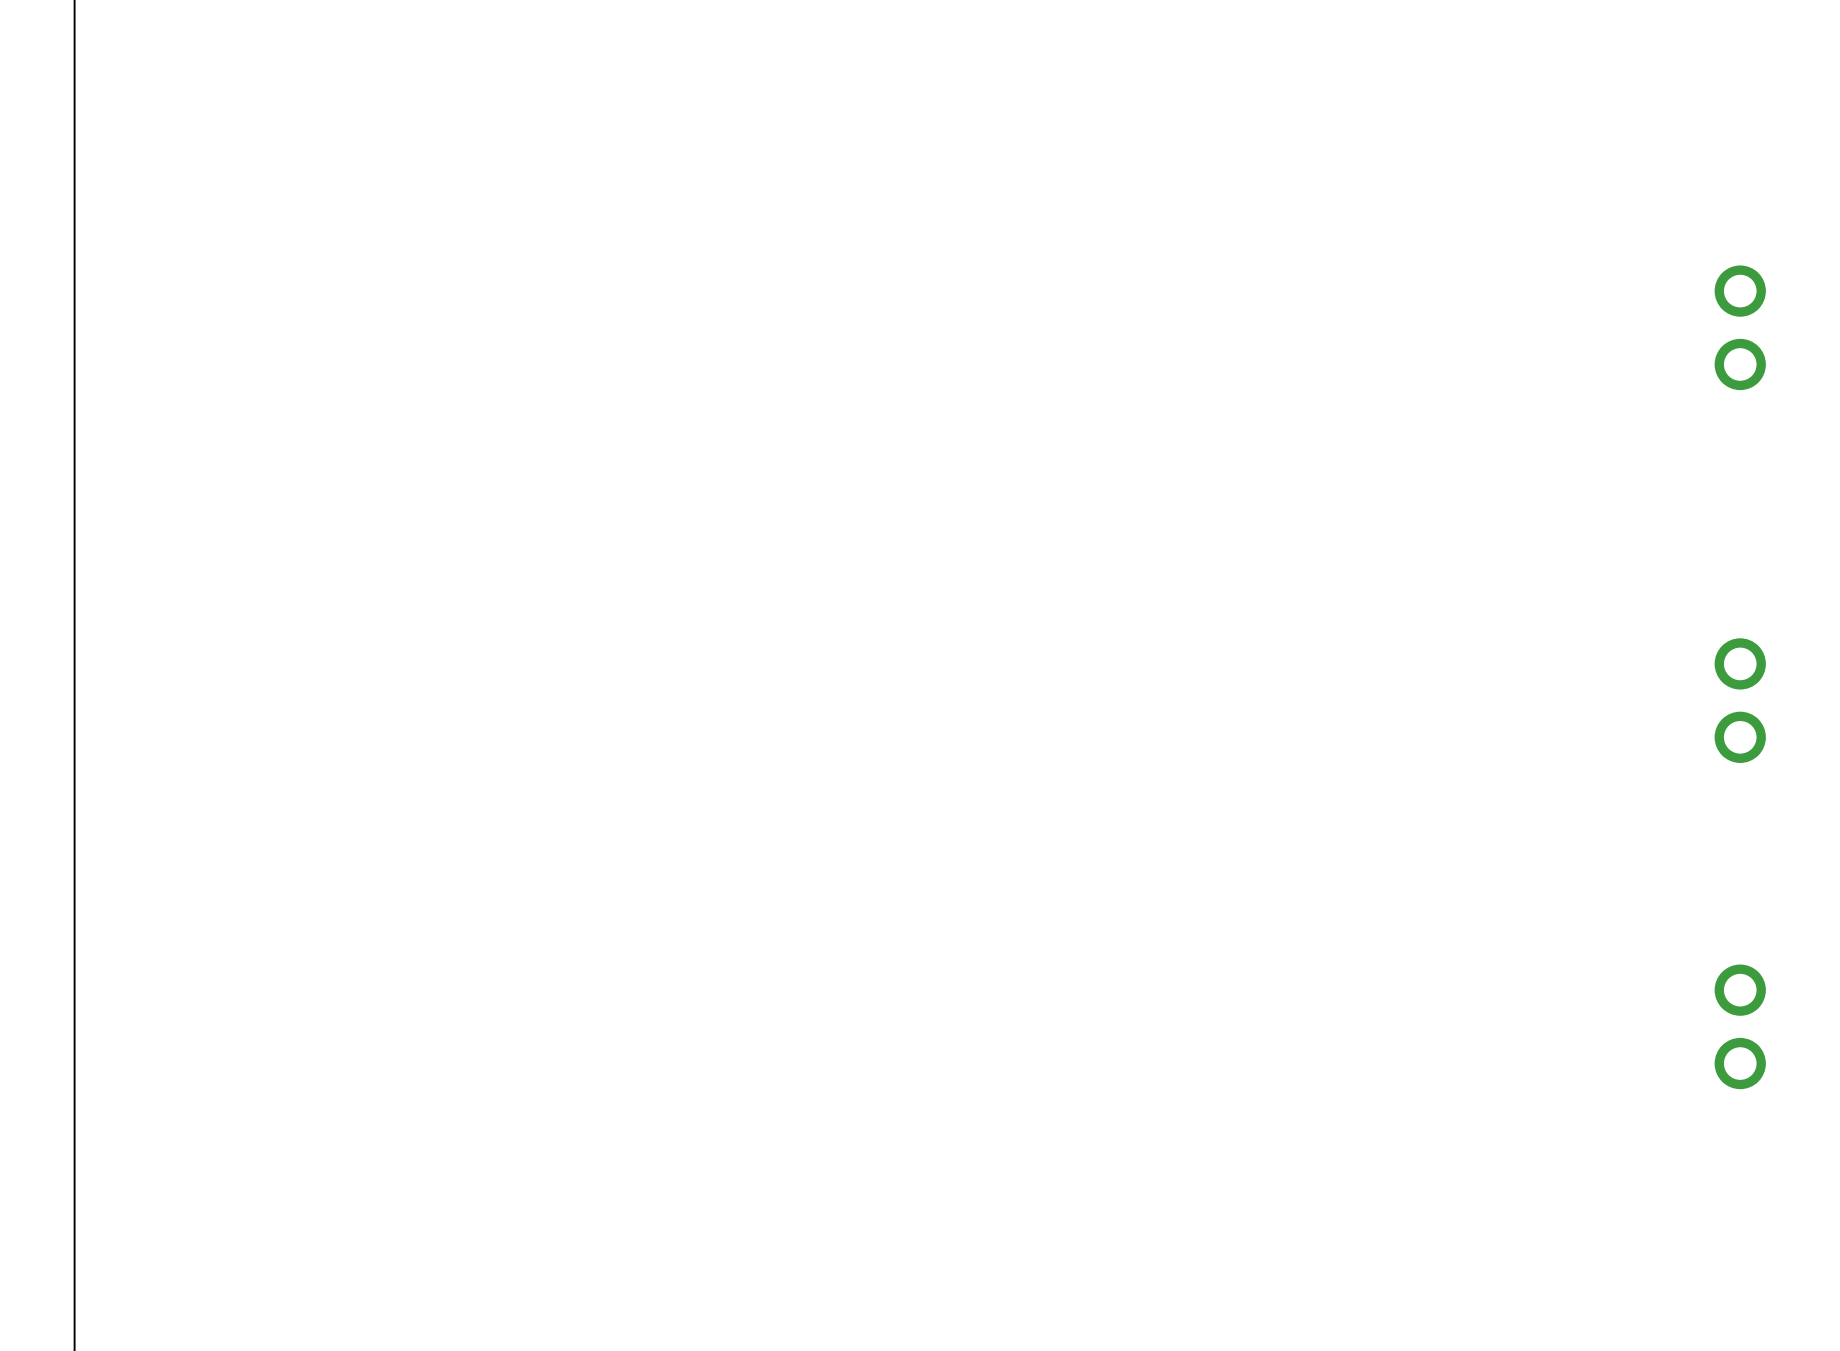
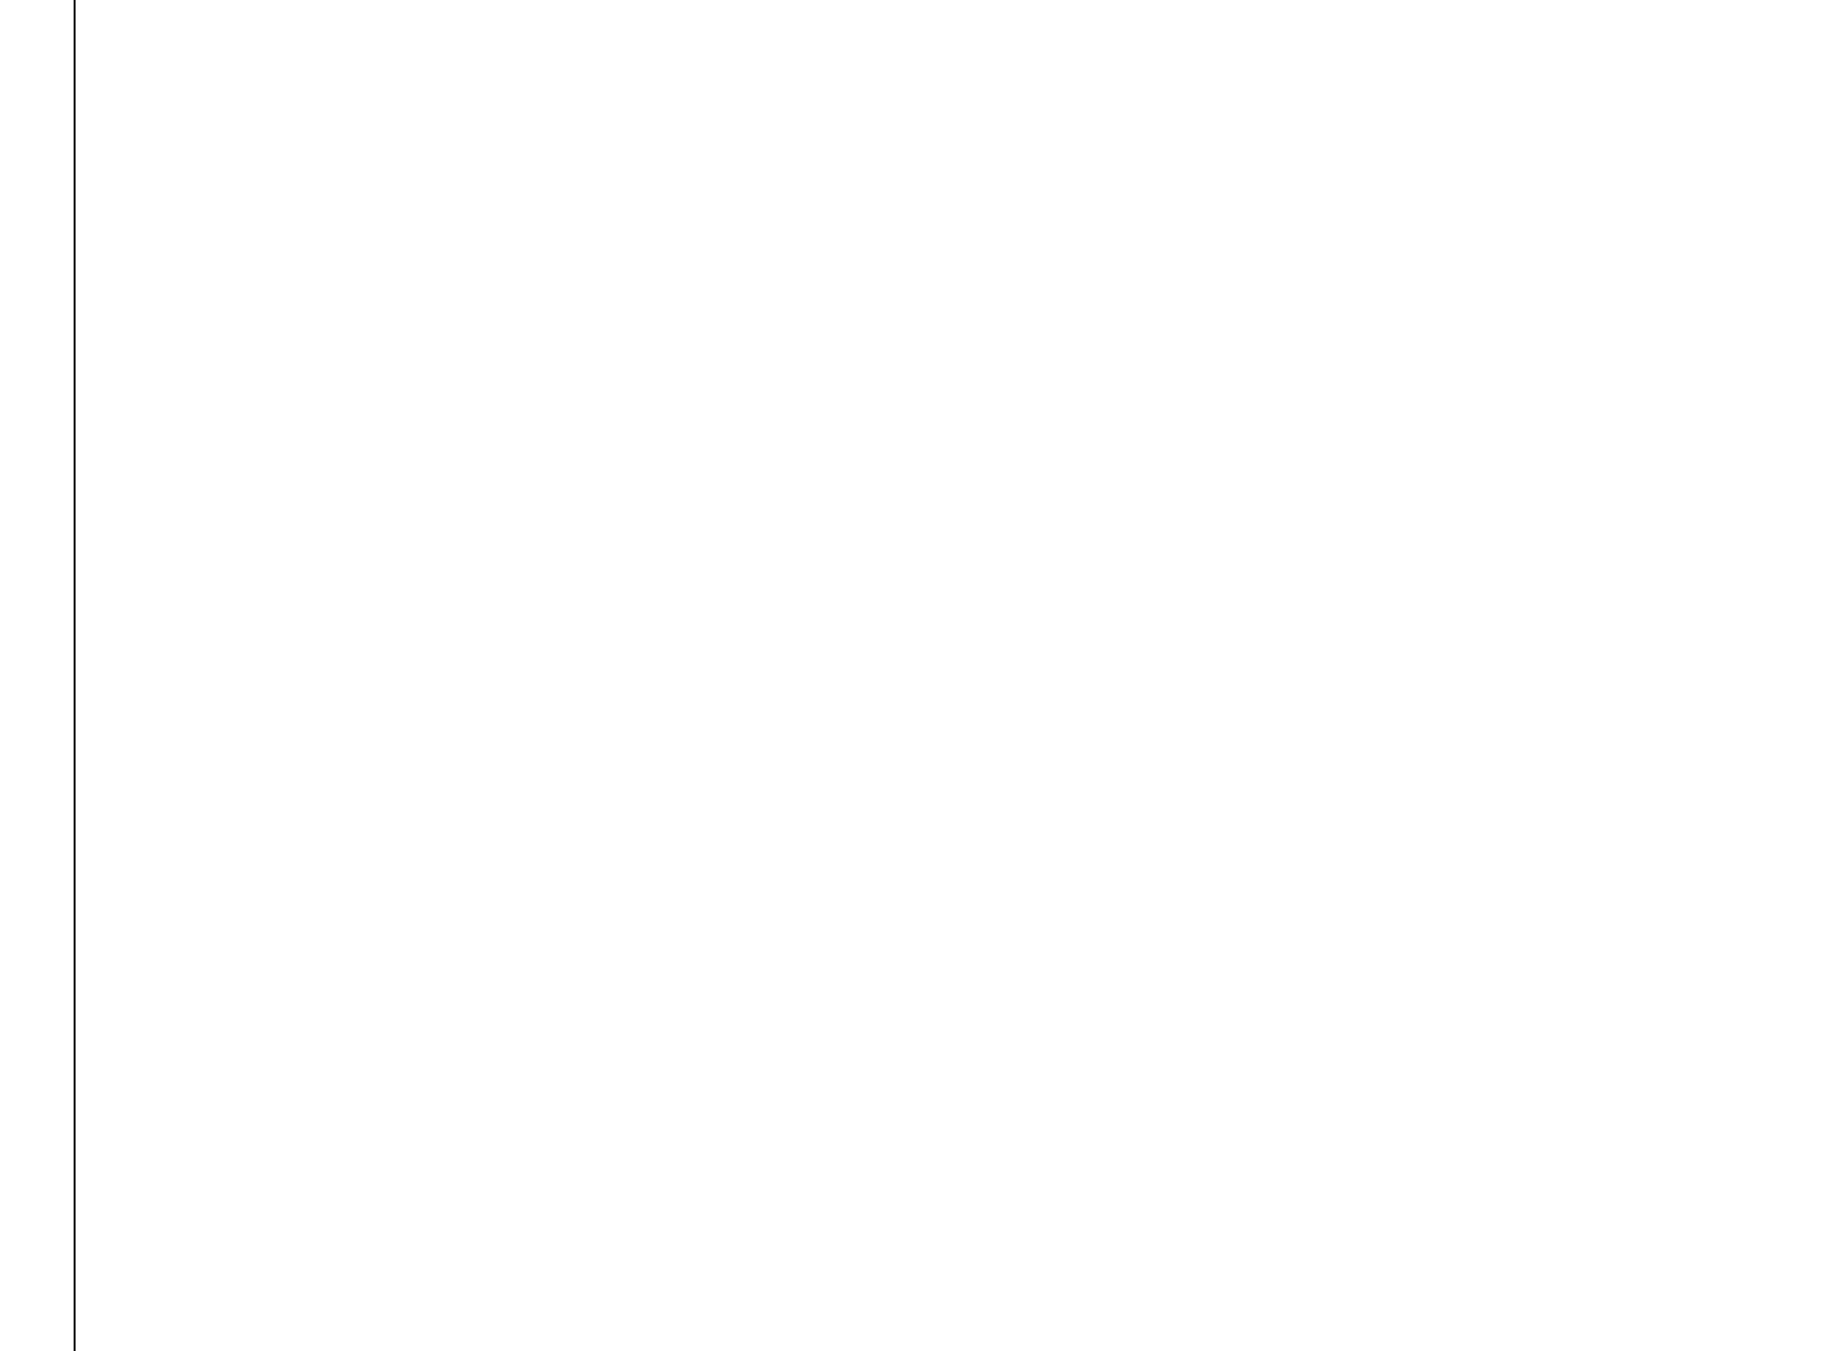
part: (1740, 327) -> none
part: (1740, 700) -> none
part: (1740, 1026) -> none

